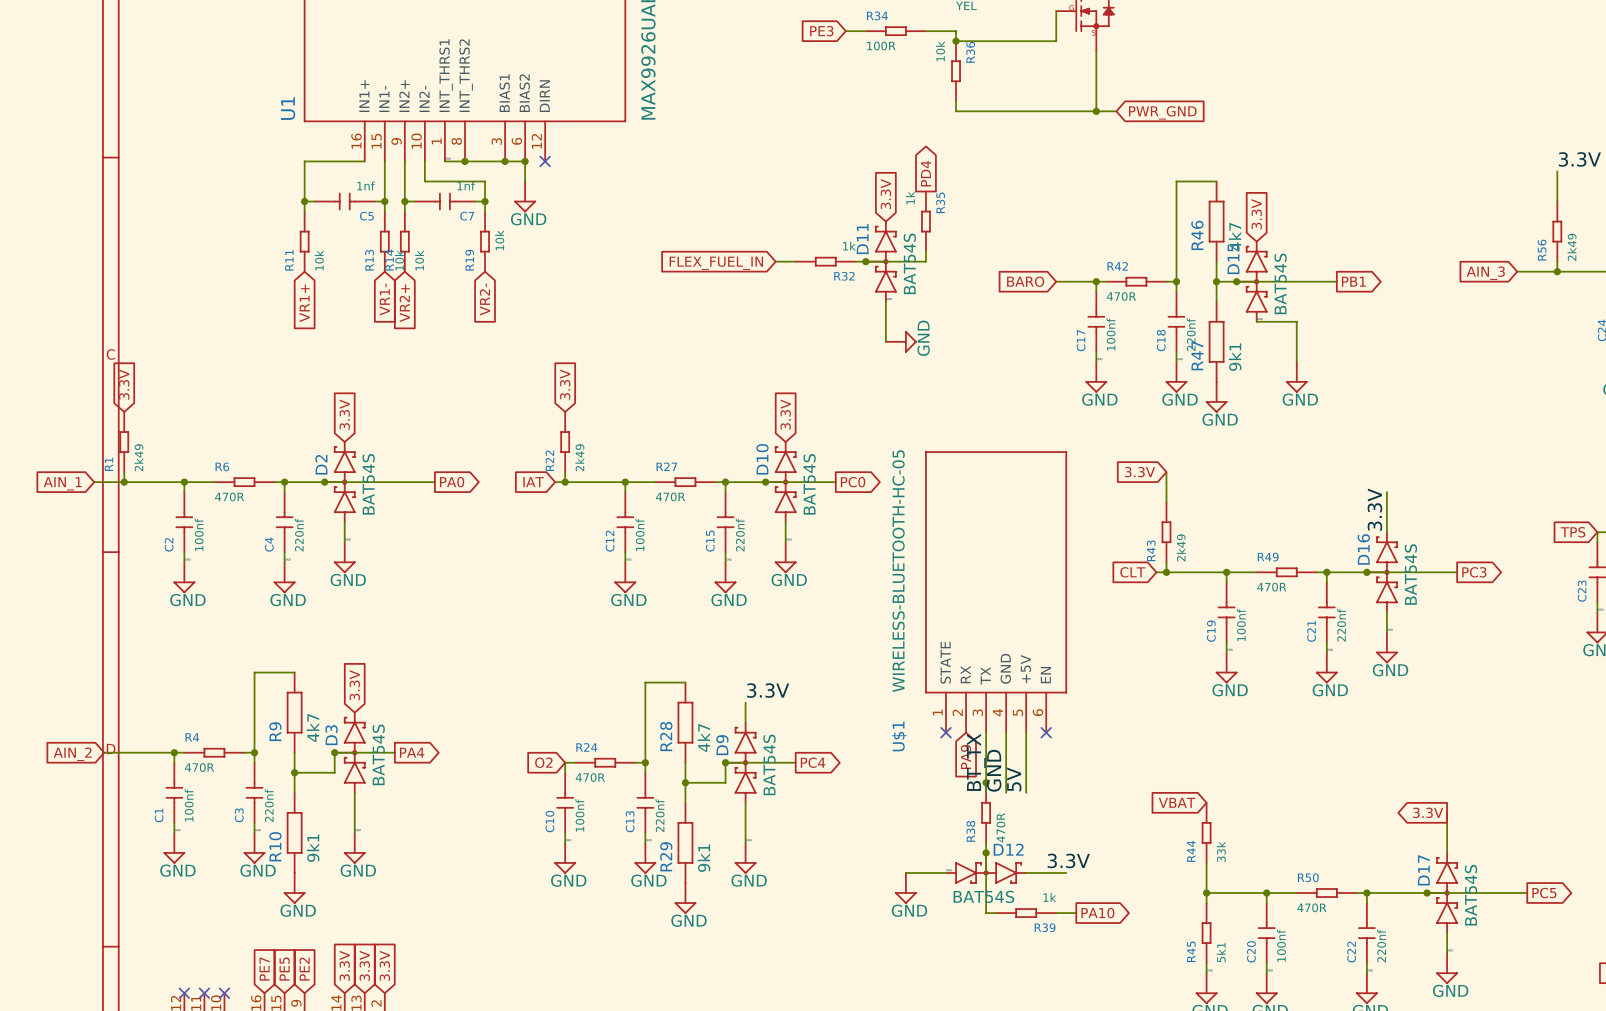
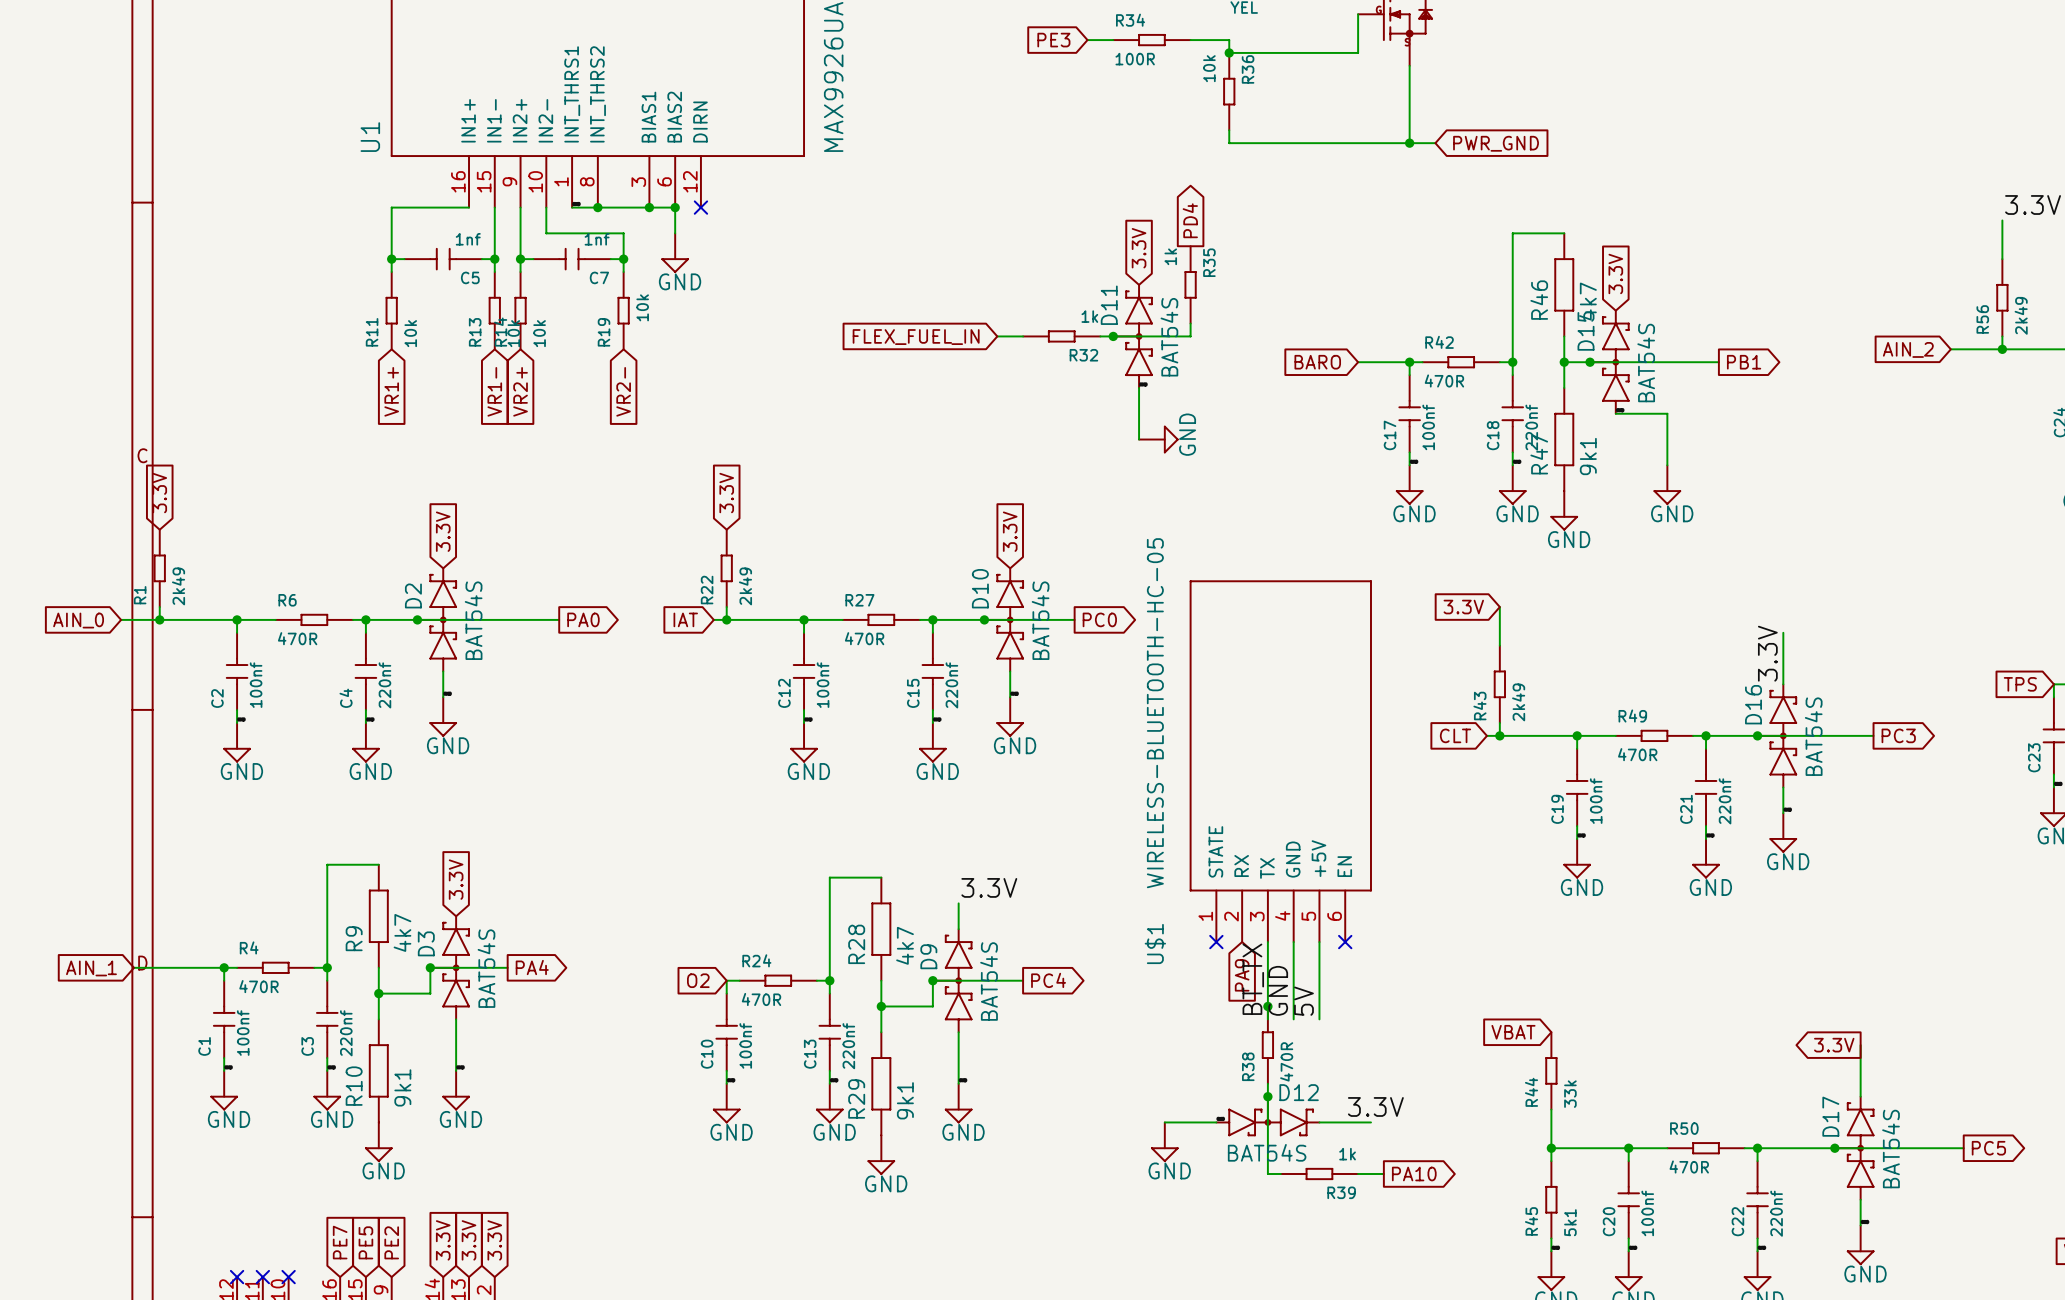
global label: AIN_3 (1485, 273) -> AIN_2 (1908, 349)
global label: AIN_1 (62, 483) -> AIN_0 (78, 620)
global label: AIN_2 (72, 754) -> AIN_1 (91, 968)

